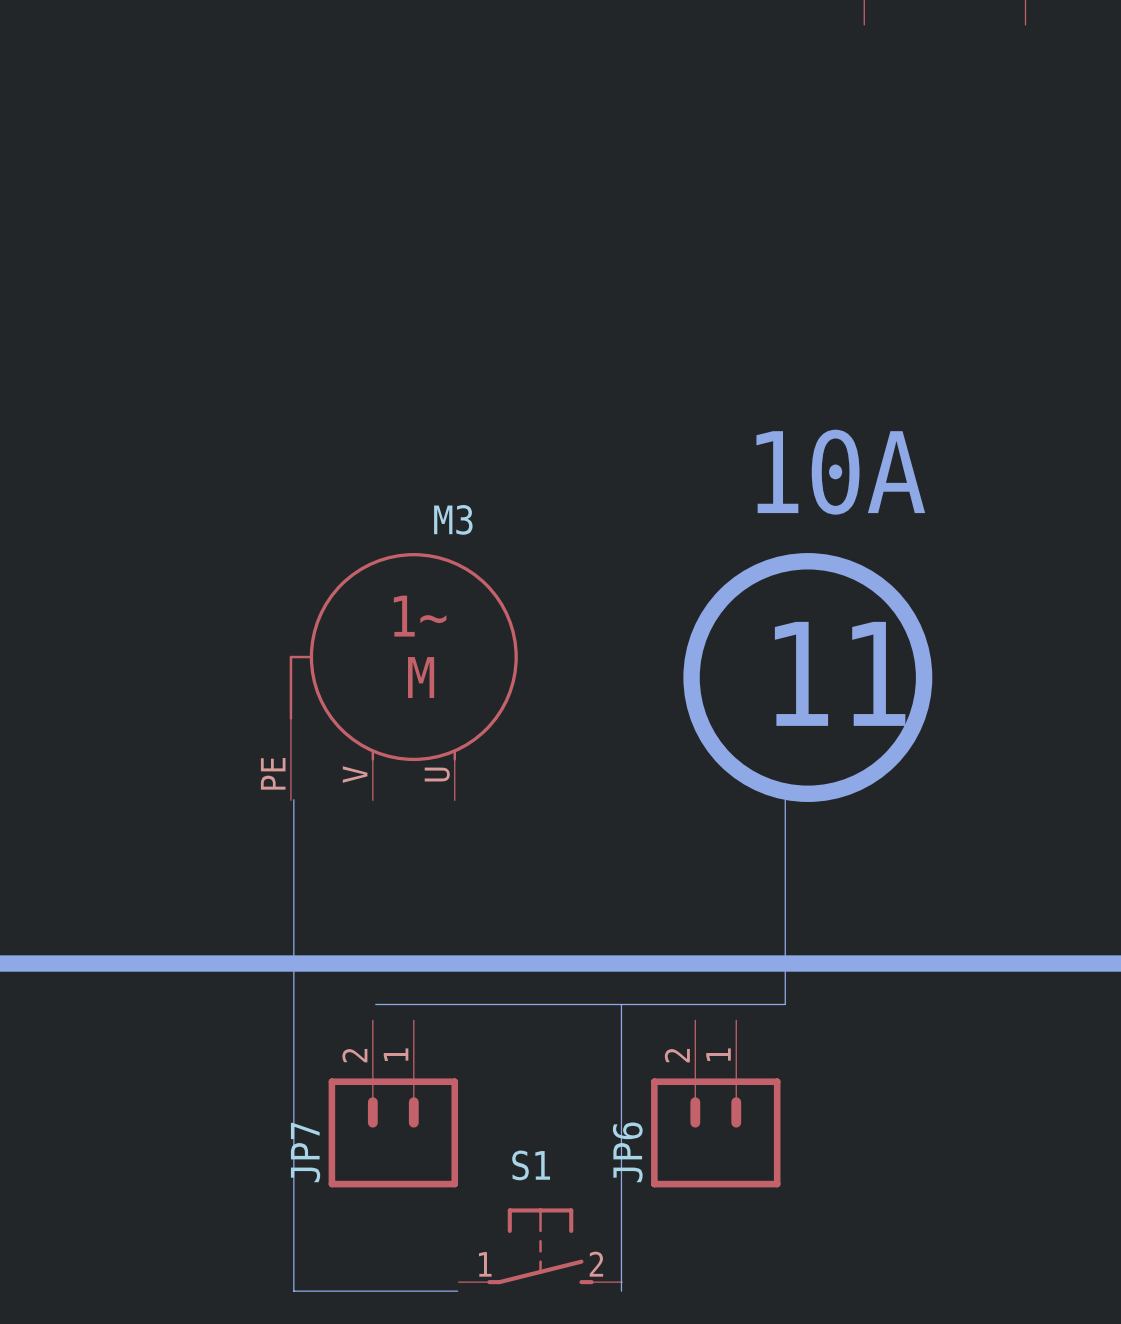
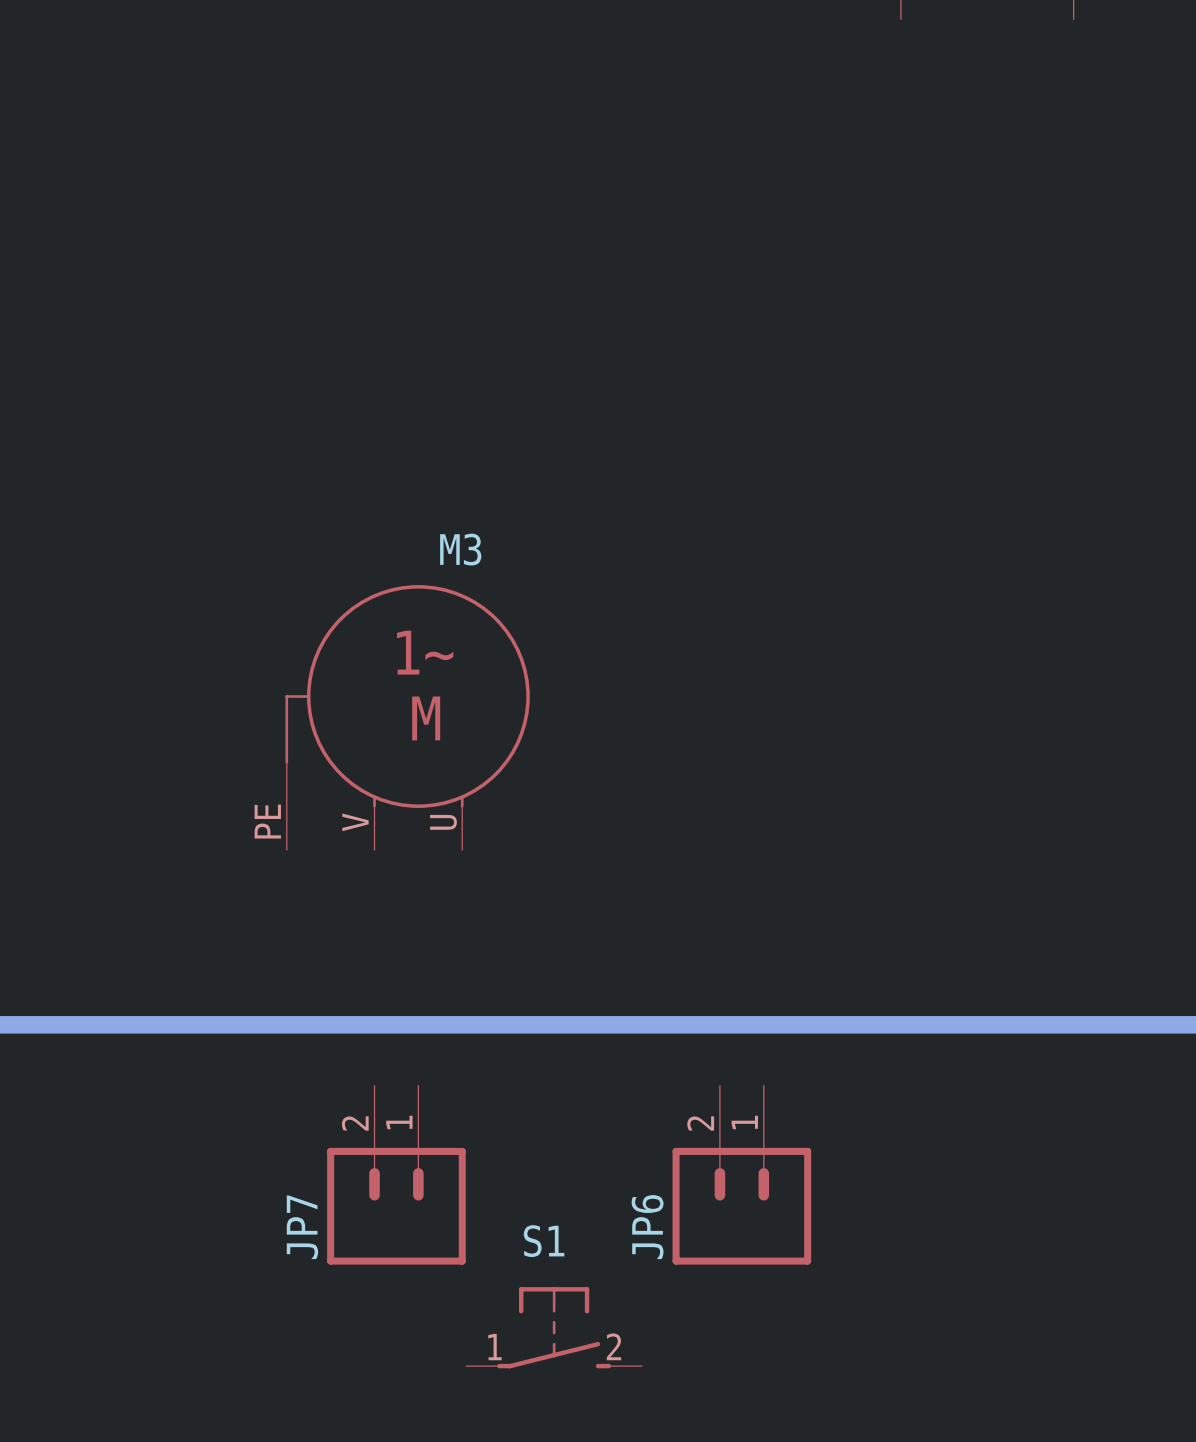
text: 10A (840, 472) -> none
drawing: [683, 553, 933, 802] -> none
text: 11 (840, 673) -> none
bus: (293, 799) (293, 1291) (457, 1291) -> none
bus: (785, 799) (785, 1004) (375, 1004) -> none
bus: (621, 1004) (621, 1291) -> none

